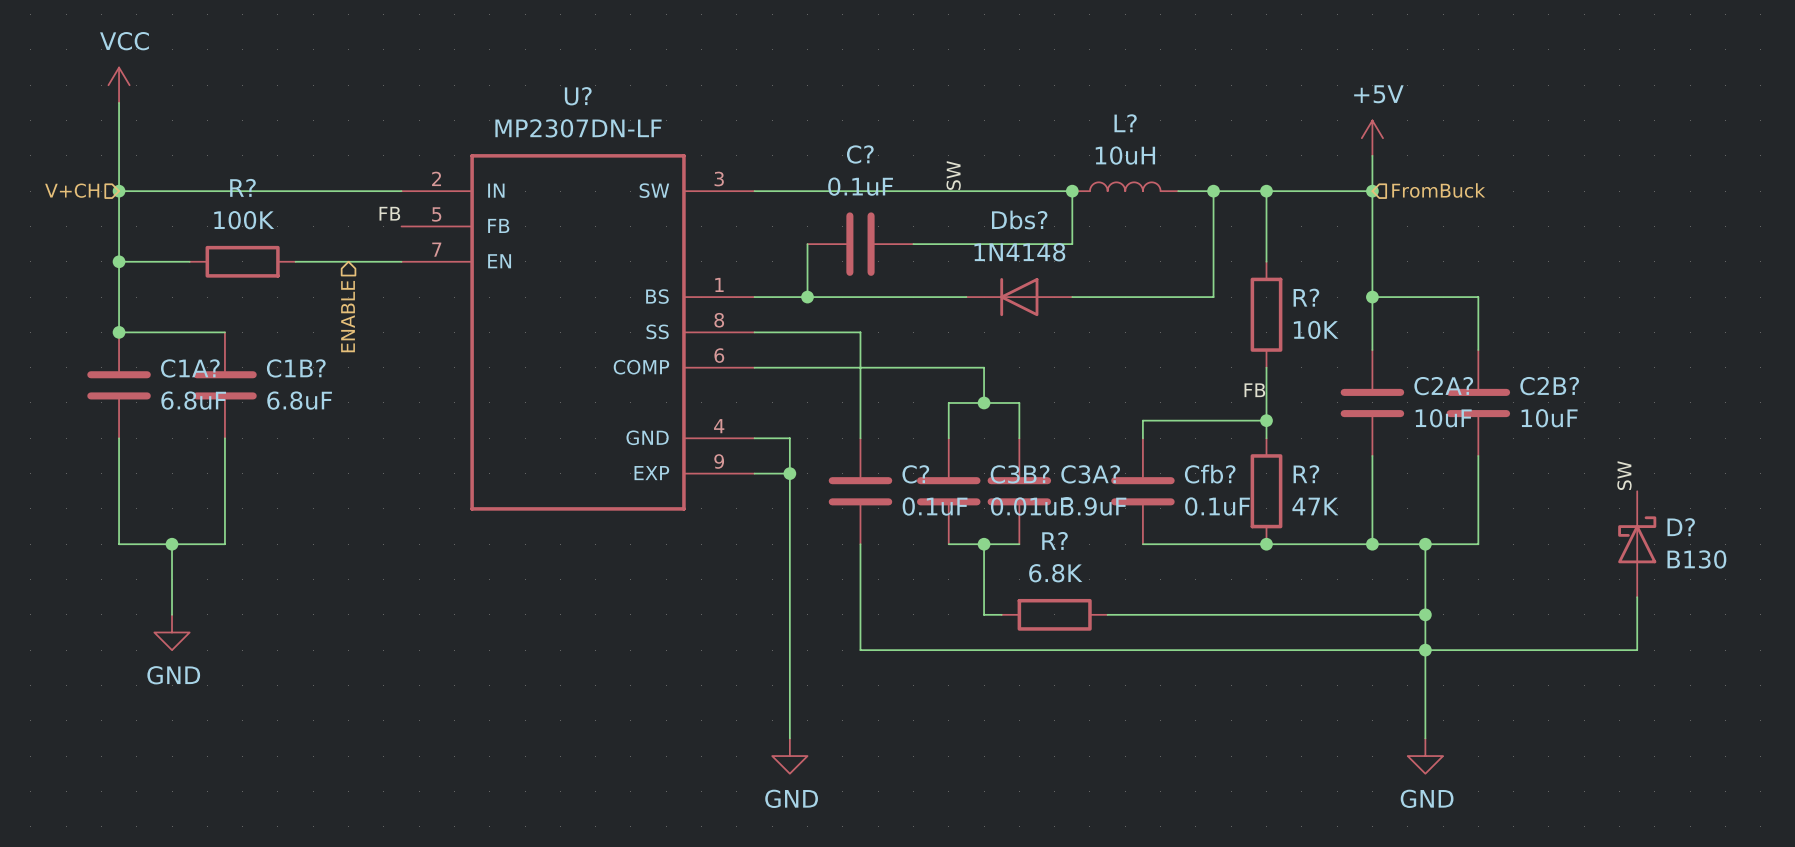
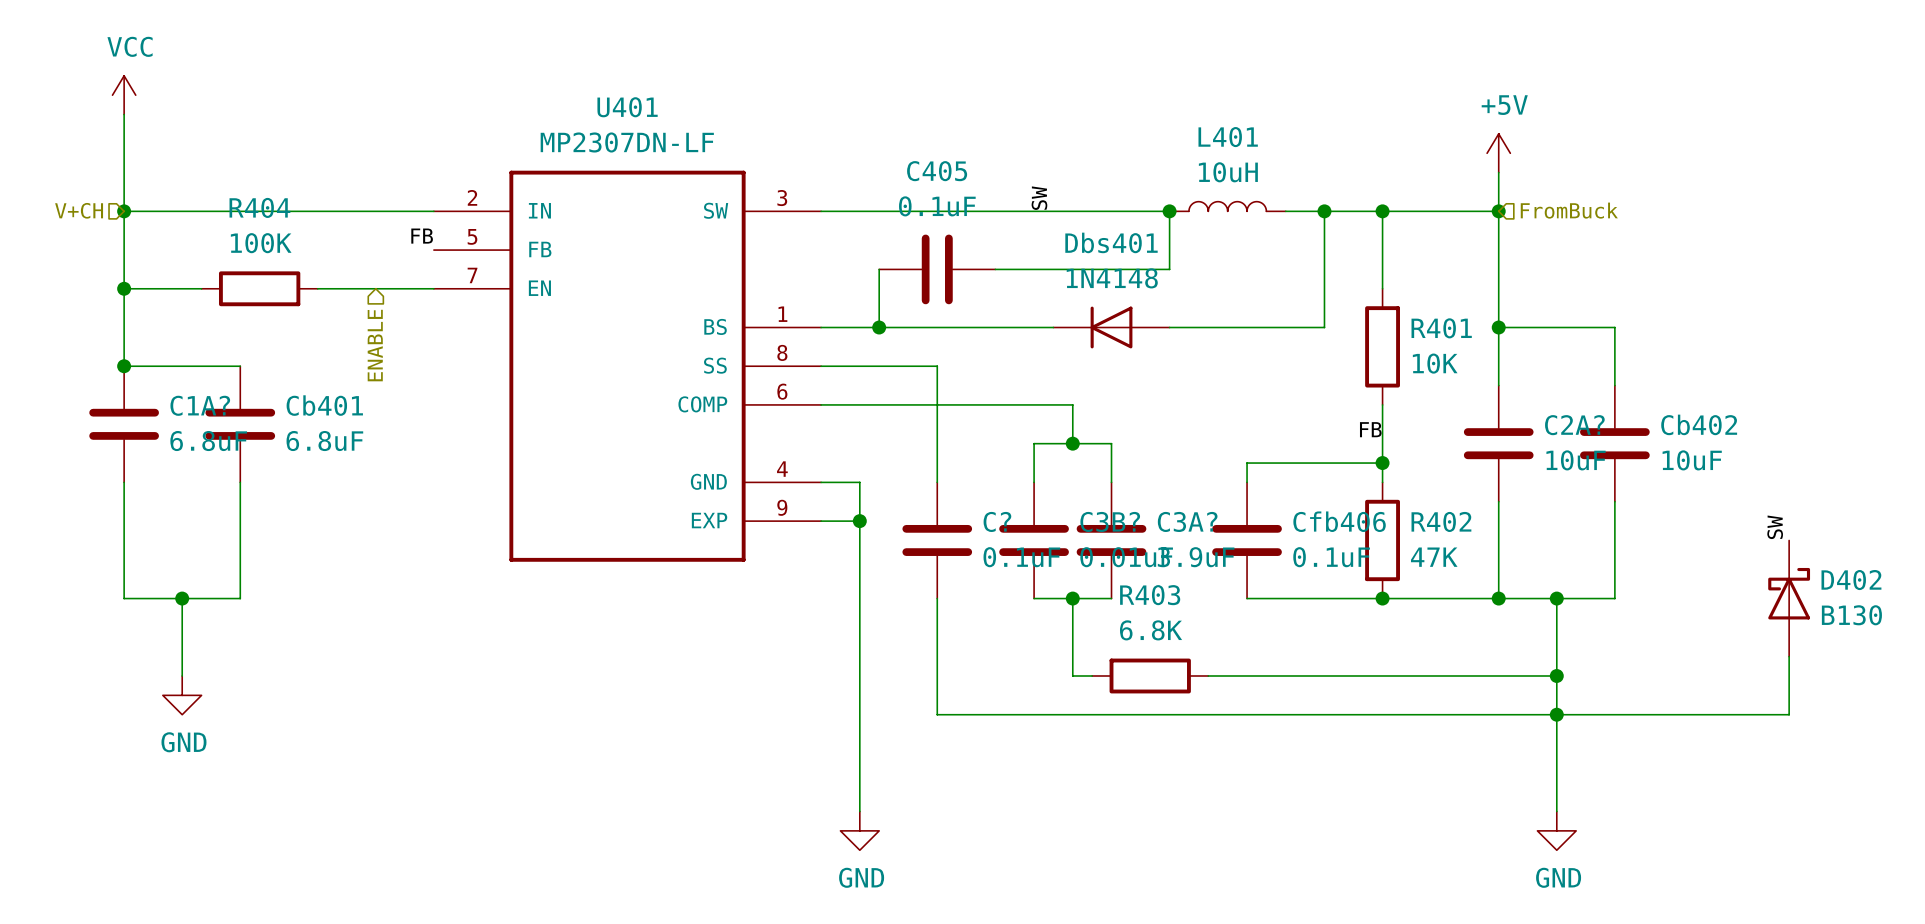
U? name: U? (578, 96) -> U401 (627, 107)
L? name: L? (1125, 123) -> L401 (1228, 137)
C? name: C? (860, 154) -> C405 (937, 171)
R? name: R? (242, 187) -> R404 (259, 207)
Dbs? name: Dbs? (1019, 219) -> Dbs401 (1111, 242)
R? name: R? (1306, 297) -> R401 (1441, 328)
C1B? name: C1B? (296, 368) -> Cb401 (324, 405)
C2B? name: C2B? (1549, 386) -> Cb402 (1699, 424)
Cfb? name: Cfb? (1210, 474) -> Cfb406 (1339, 521)
R? name: R? (1306, 474) -> R402 (1441, 521)
D? name: D? (1681, 527) -> D402 (1851, 580)
R? name: R? (1055, 540) -> R403 (1150, 595)

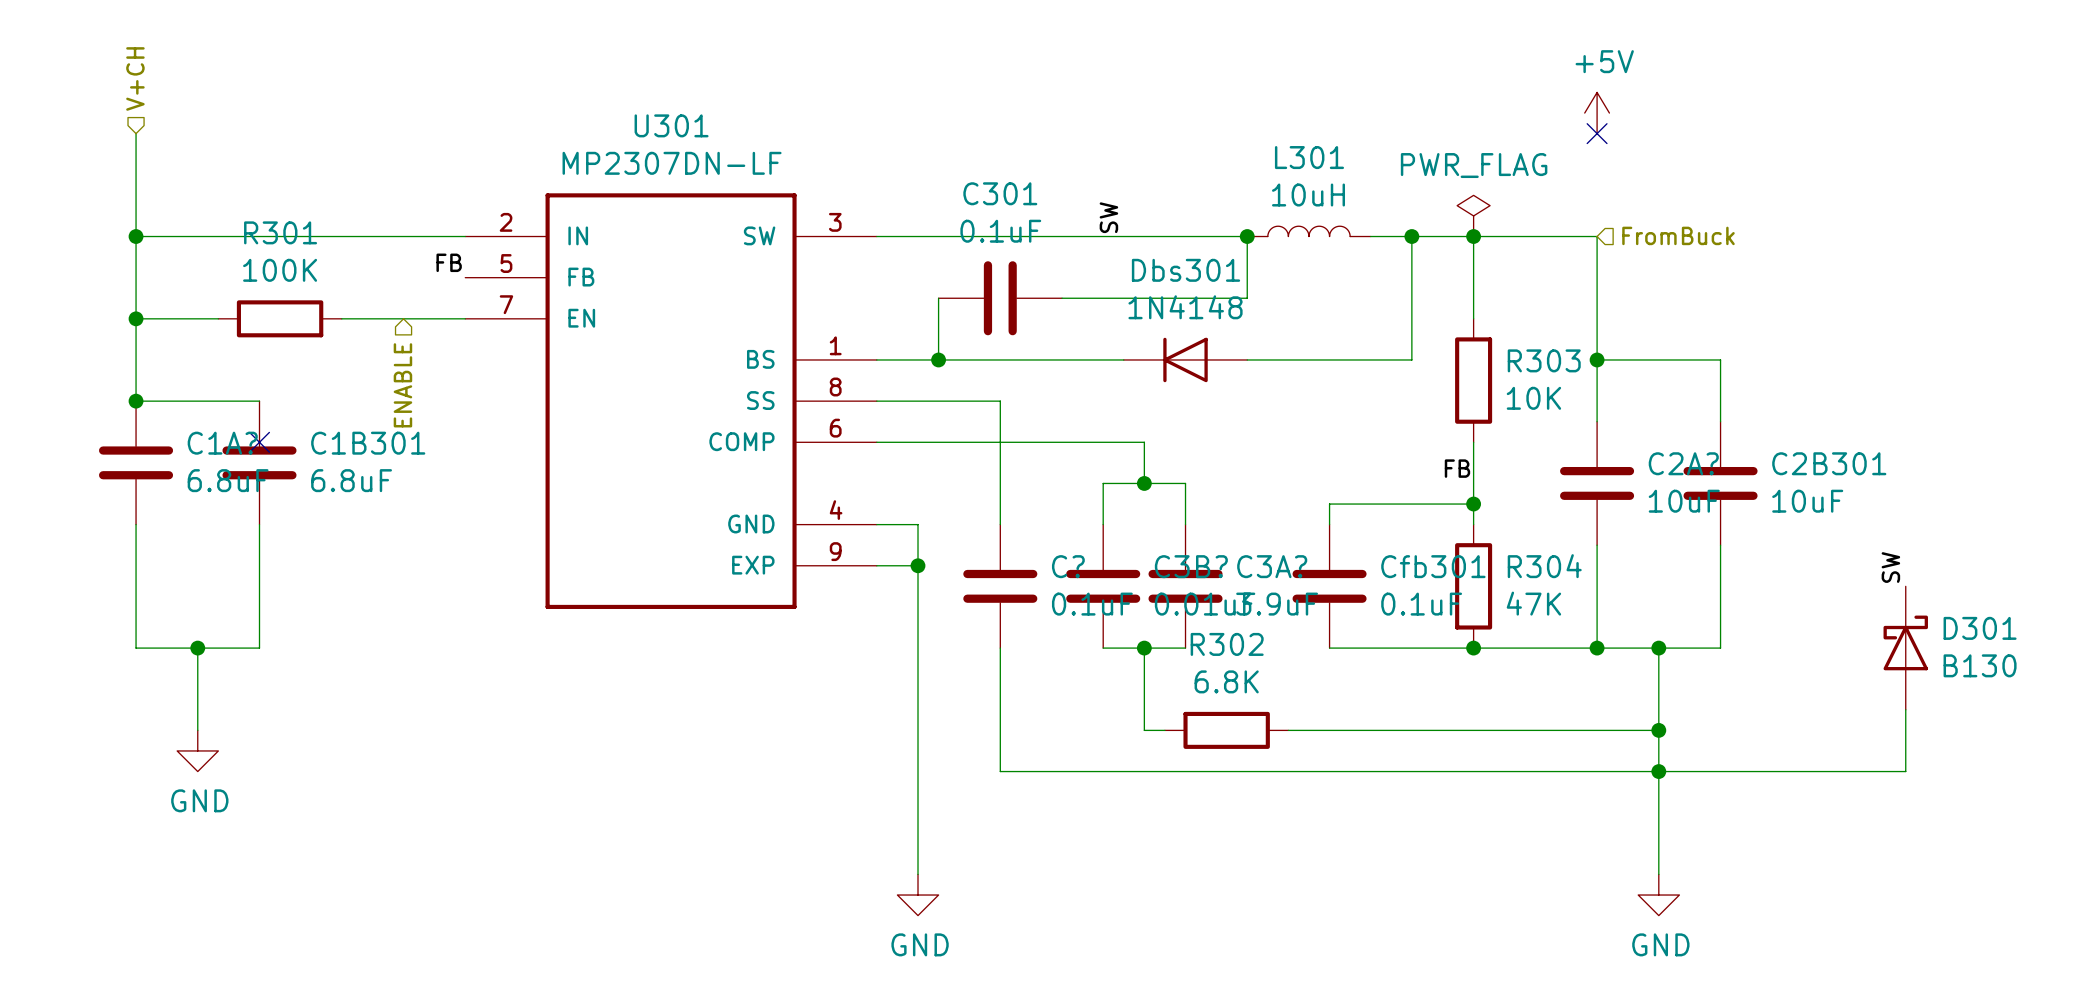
power symbol: VCC (124, 95) -> none
U401 name: U401 (627, 107) -> U301 (671, 125)
no-connect mark: none -> (1597, 133)
L401 name: L401 (1228, 137) -> L301 (1309, 157)
power symbol position: +5V (1498, 153) -> +5V (1597, 113)
C405 name: C405 (937, 171) -> C301 (1000, 193)
wire: (1498, 172) (1498, 211) -> none
power symbol: none -> PWR_FLAG (1473, 215)
R404 name: R404 (259, 207) -> R301 (280, 232)
hierarchical label rotation: 0° (79, 210) -> 90° clockwise (135, 78)
hierarchical label position: V+CH (79, 210) -> V+CH (135, 78)
junction: (1498, 211) -> none
Dbs401 name: Dbs401 (1111, 242) -> Dbs301 (1186, 270)
R401 name: R401 (1441, 328) -> R303 (1544, 360)
no-connect mark: none -> (259, 442)
Cb401 name: Cb401 (324, 405) -> C1B301 (368, 443)
Cb402 name: Cb402 (1699, 424) -> C2B301 (1829, 463)
Cfb406 name: Cfb406 (1339, 521) -> Cfb301 (1433, 566)
R402 name: R402 (1441, 521) -> R304 (1544, 566)
D402 name: D402 (1851, 580) -> D301 (1980, 628)
R403 name: R403 (1150, 595) -> R302 (1227, 644)

